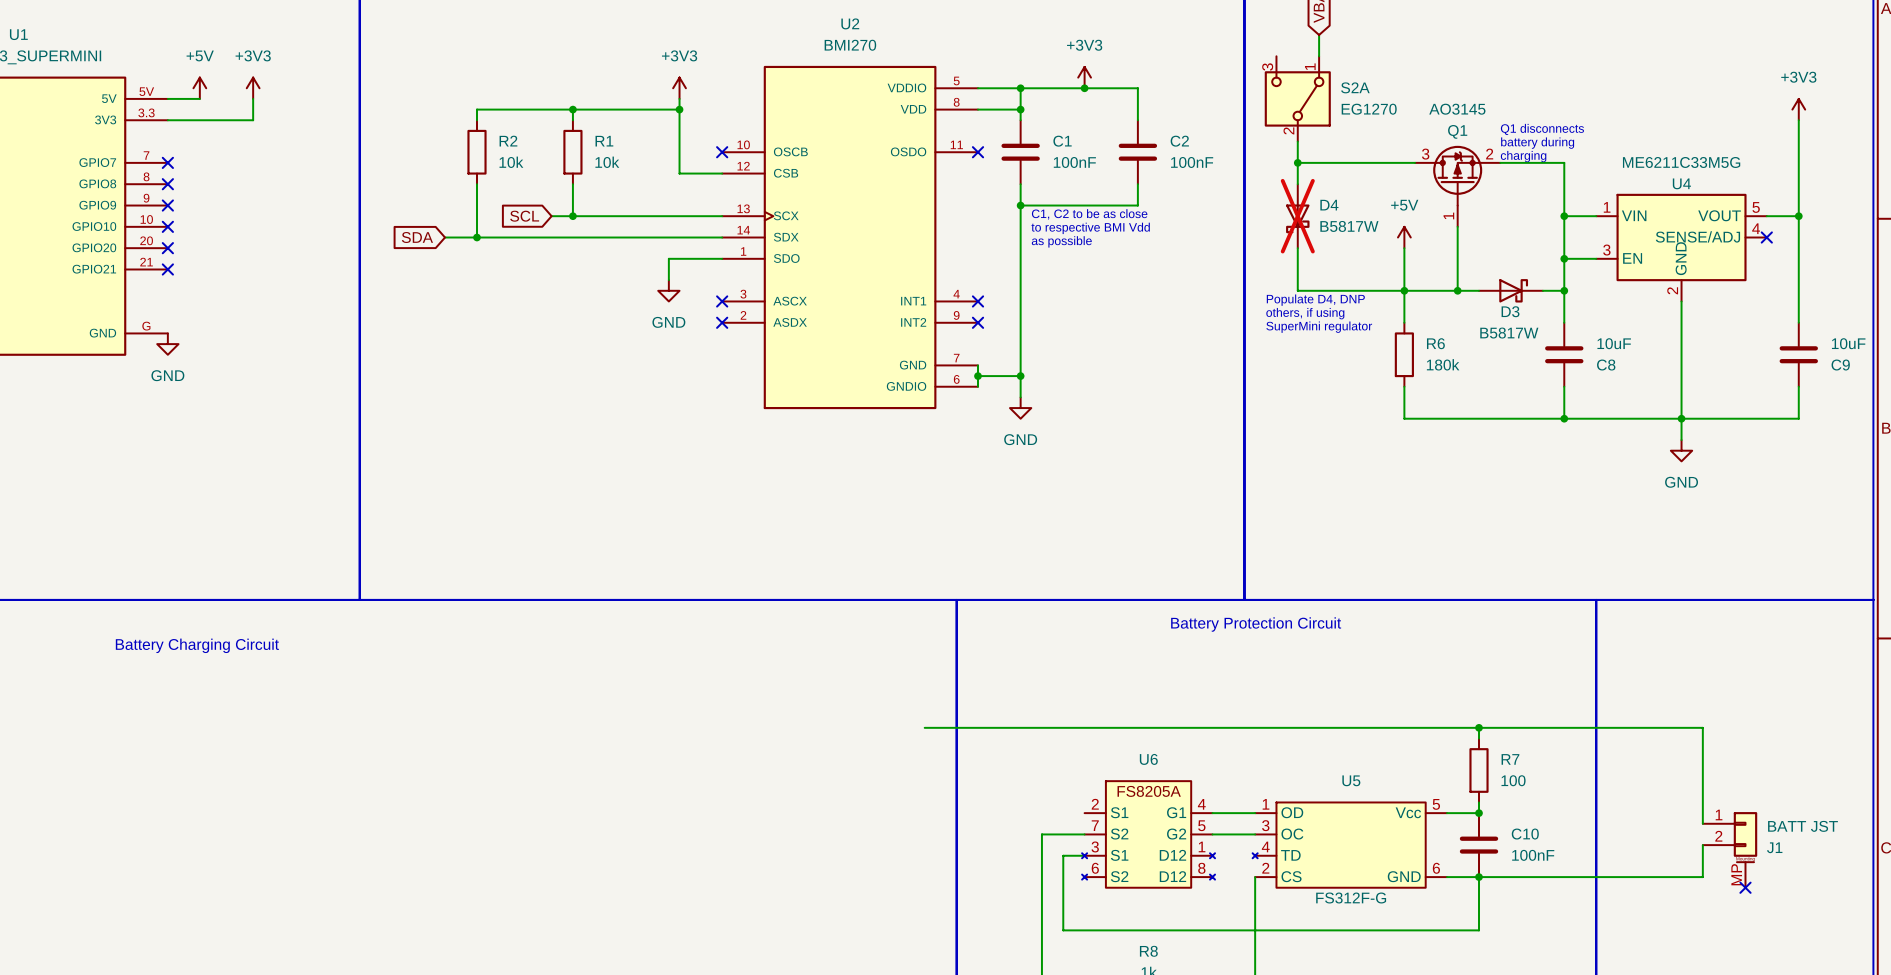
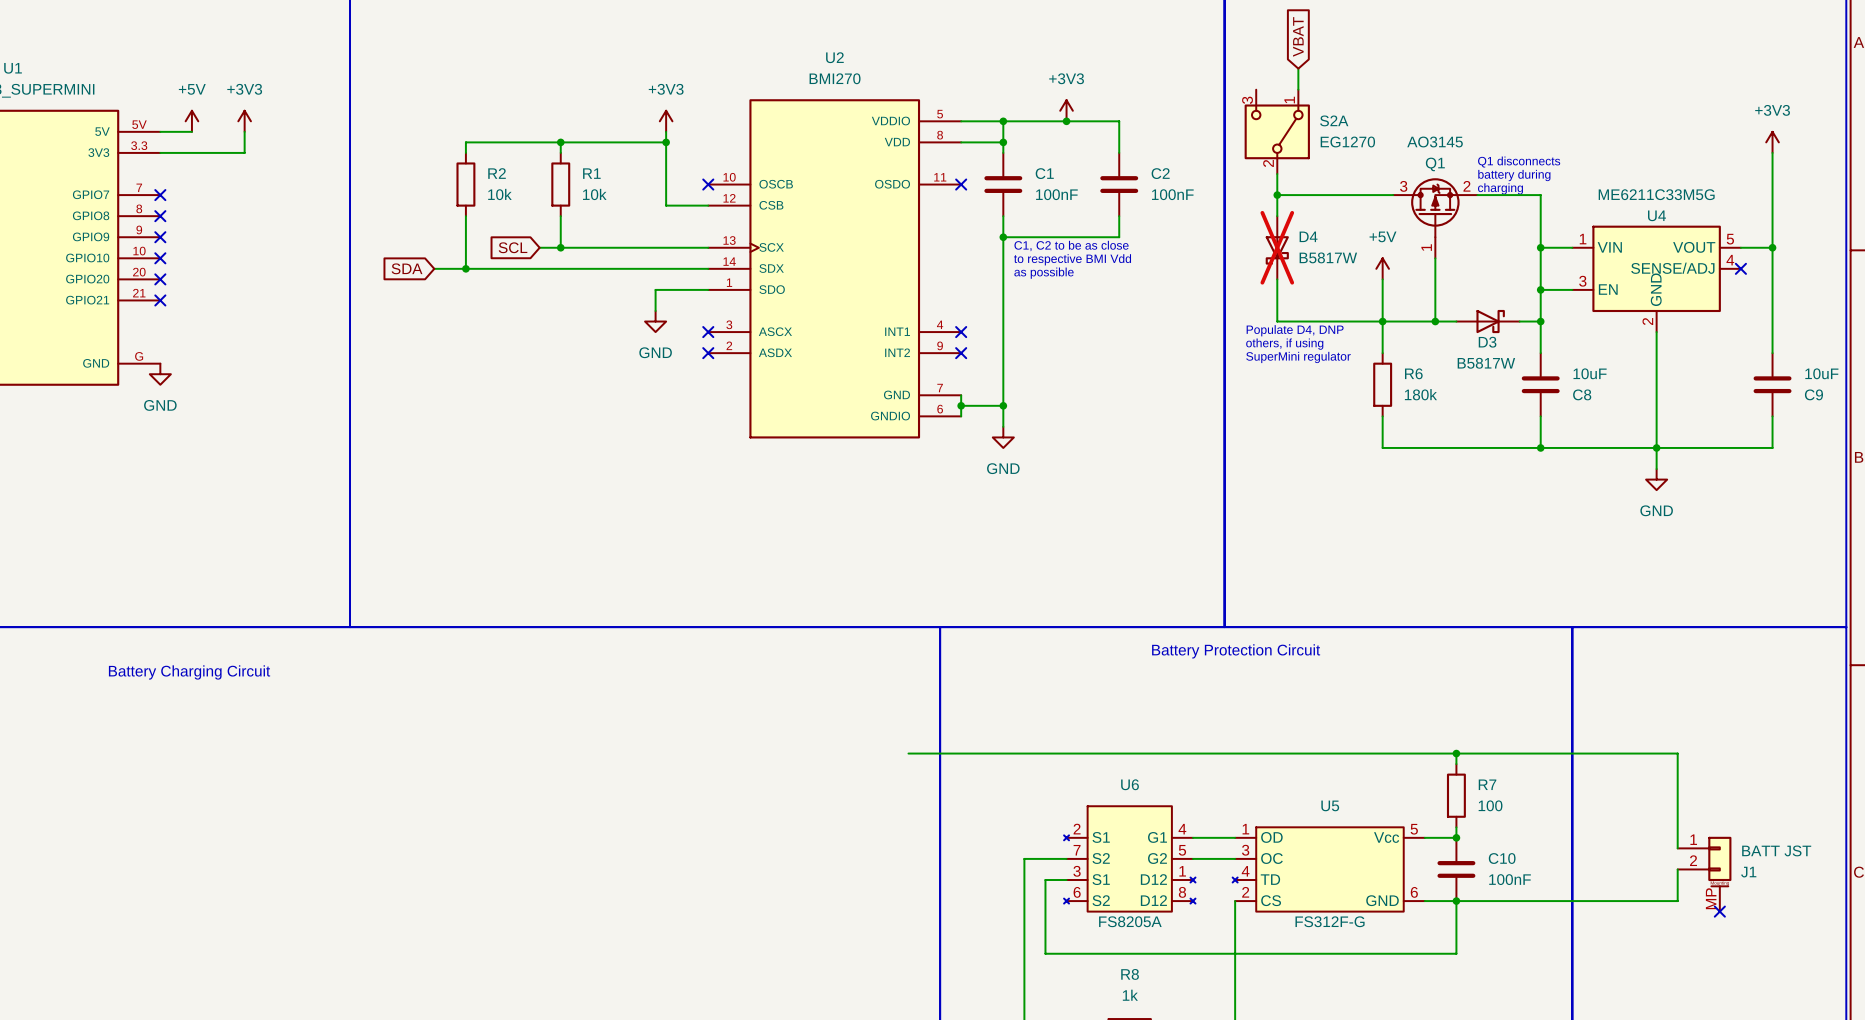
U6 symbol: [1082, 781, 1216, 888] -> [1064, 806, 1196, 912]
U6 value: none -> FS8205A (1130, 921)

